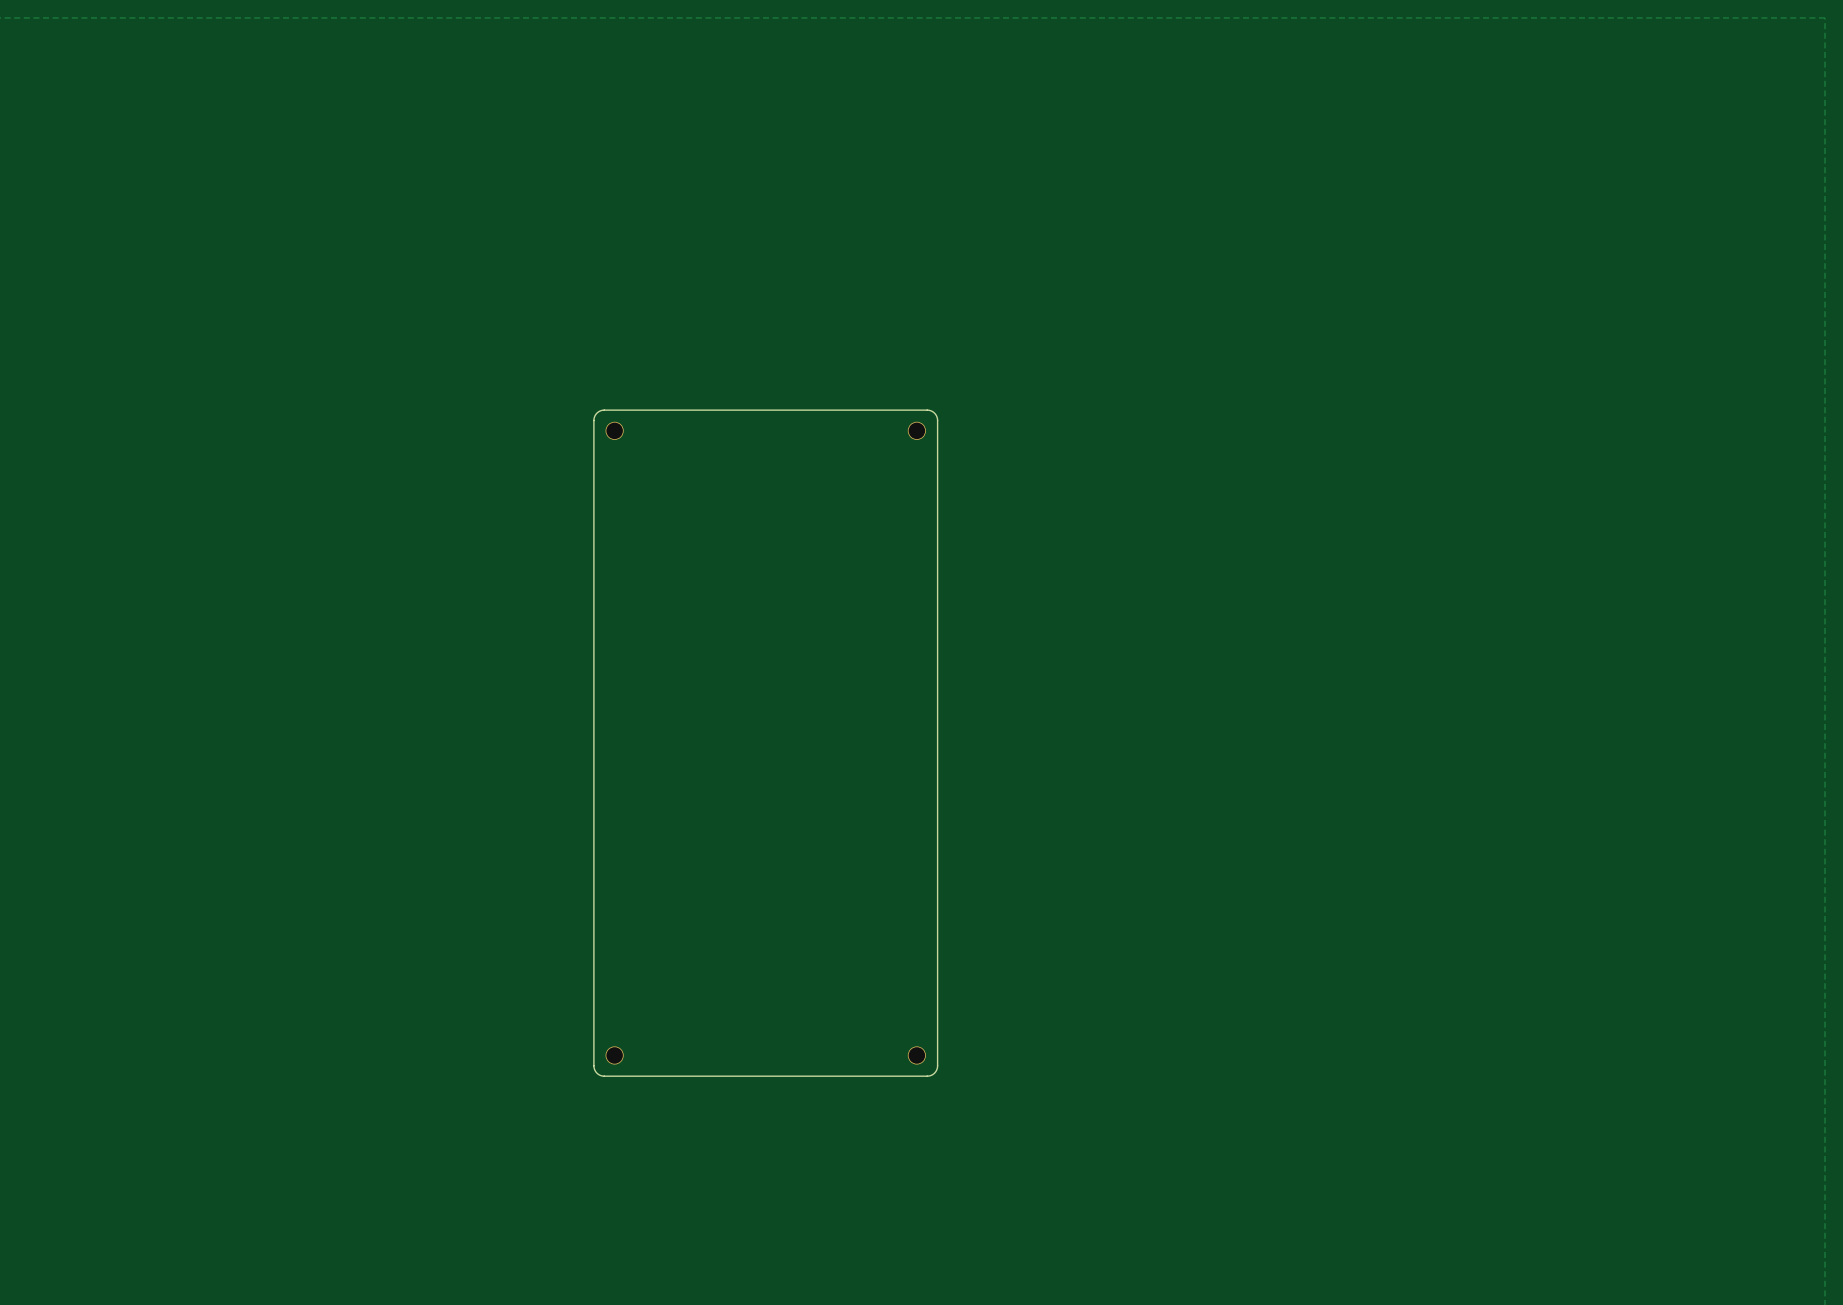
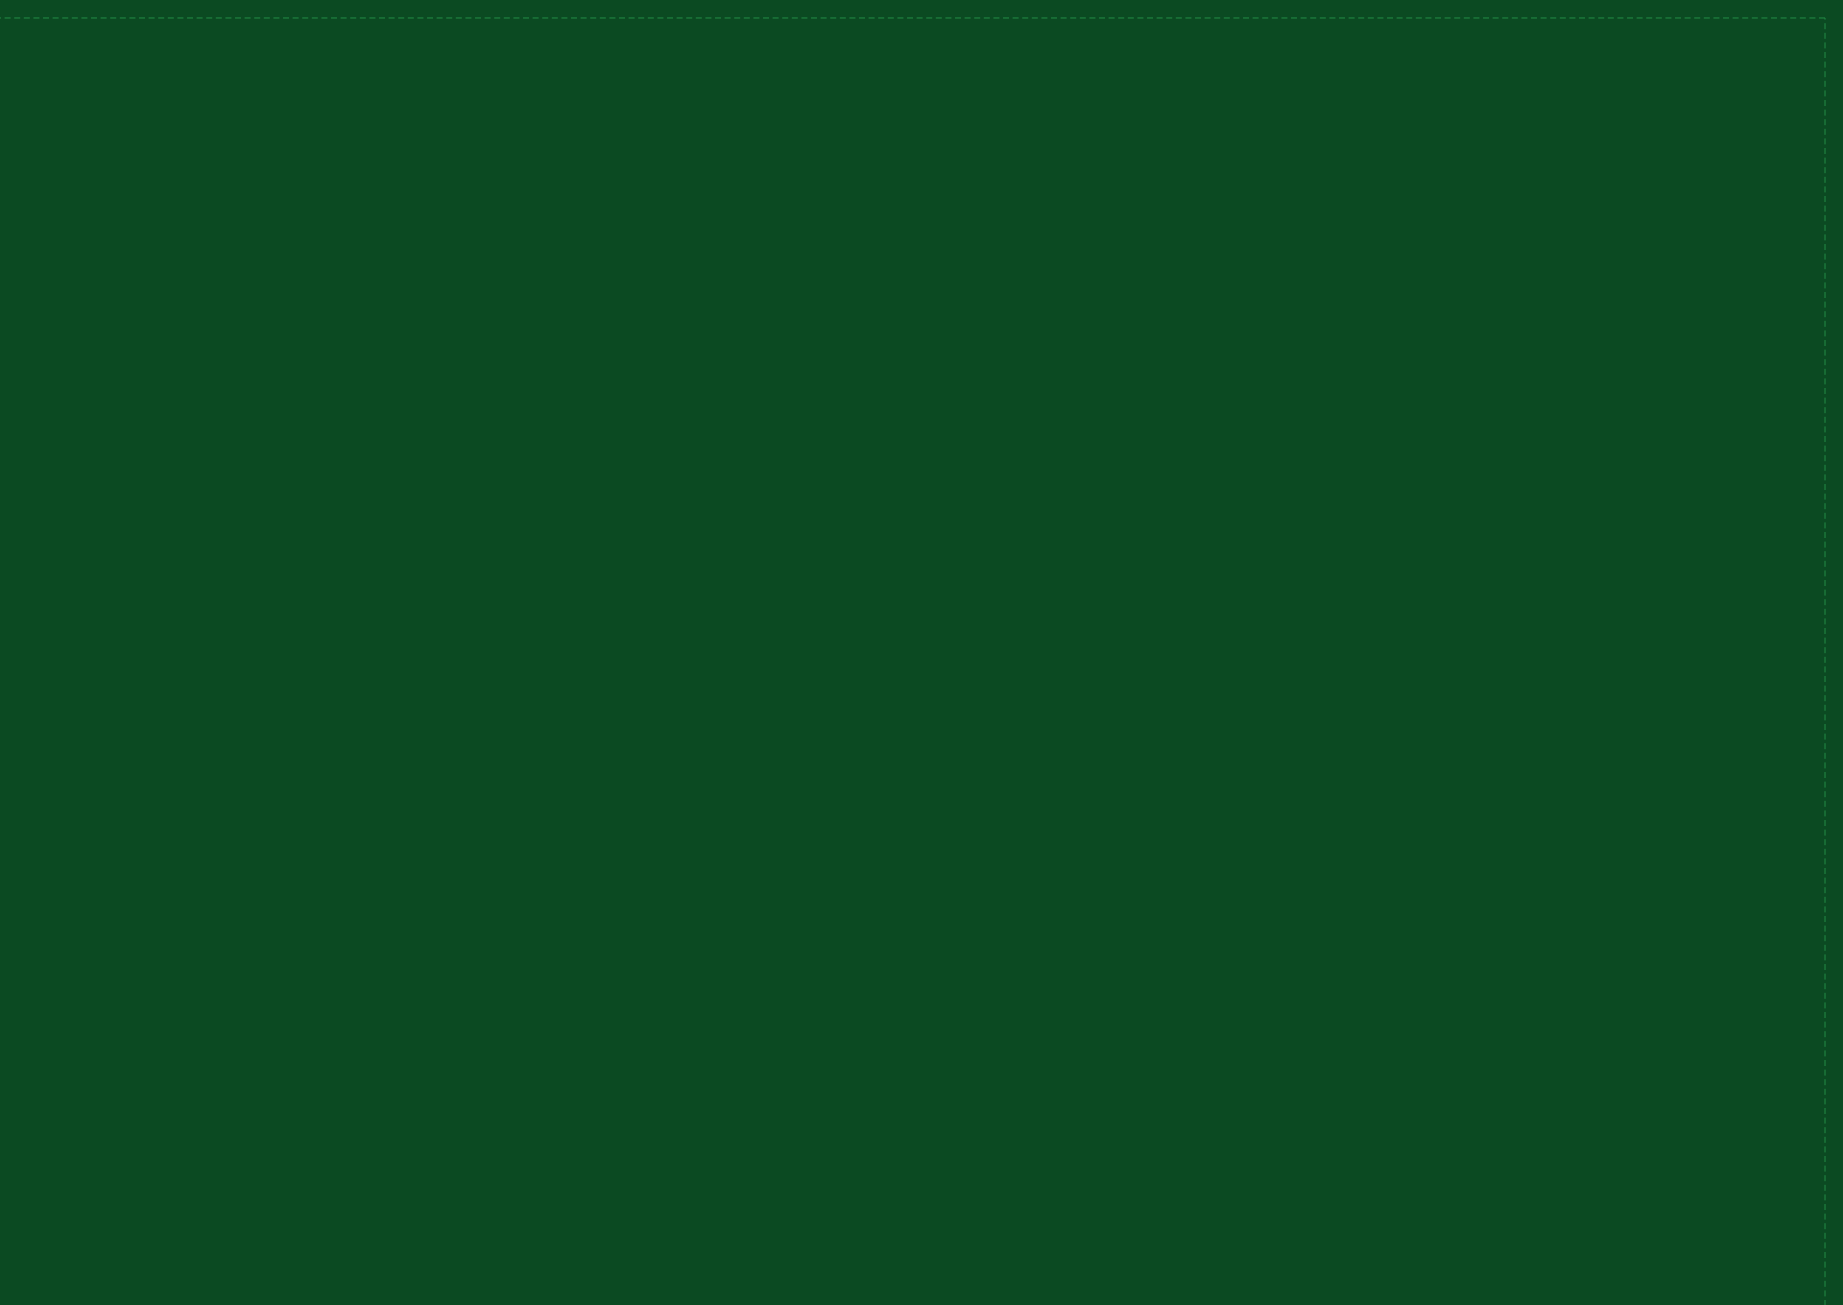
board edge: (927, 410) (604, 410) (598, 411) (594, 415) (593, 1065) (595, 1071) (599, 1075) (927, 1076) (932, 1074) (936, 1070) (937, 420) (934, 413) (927, 410) -> none
part: (614, 430) -> none
part: (916, 430) -> none
part: (614, 1055) -> none
part: (916, 1055) -> none

